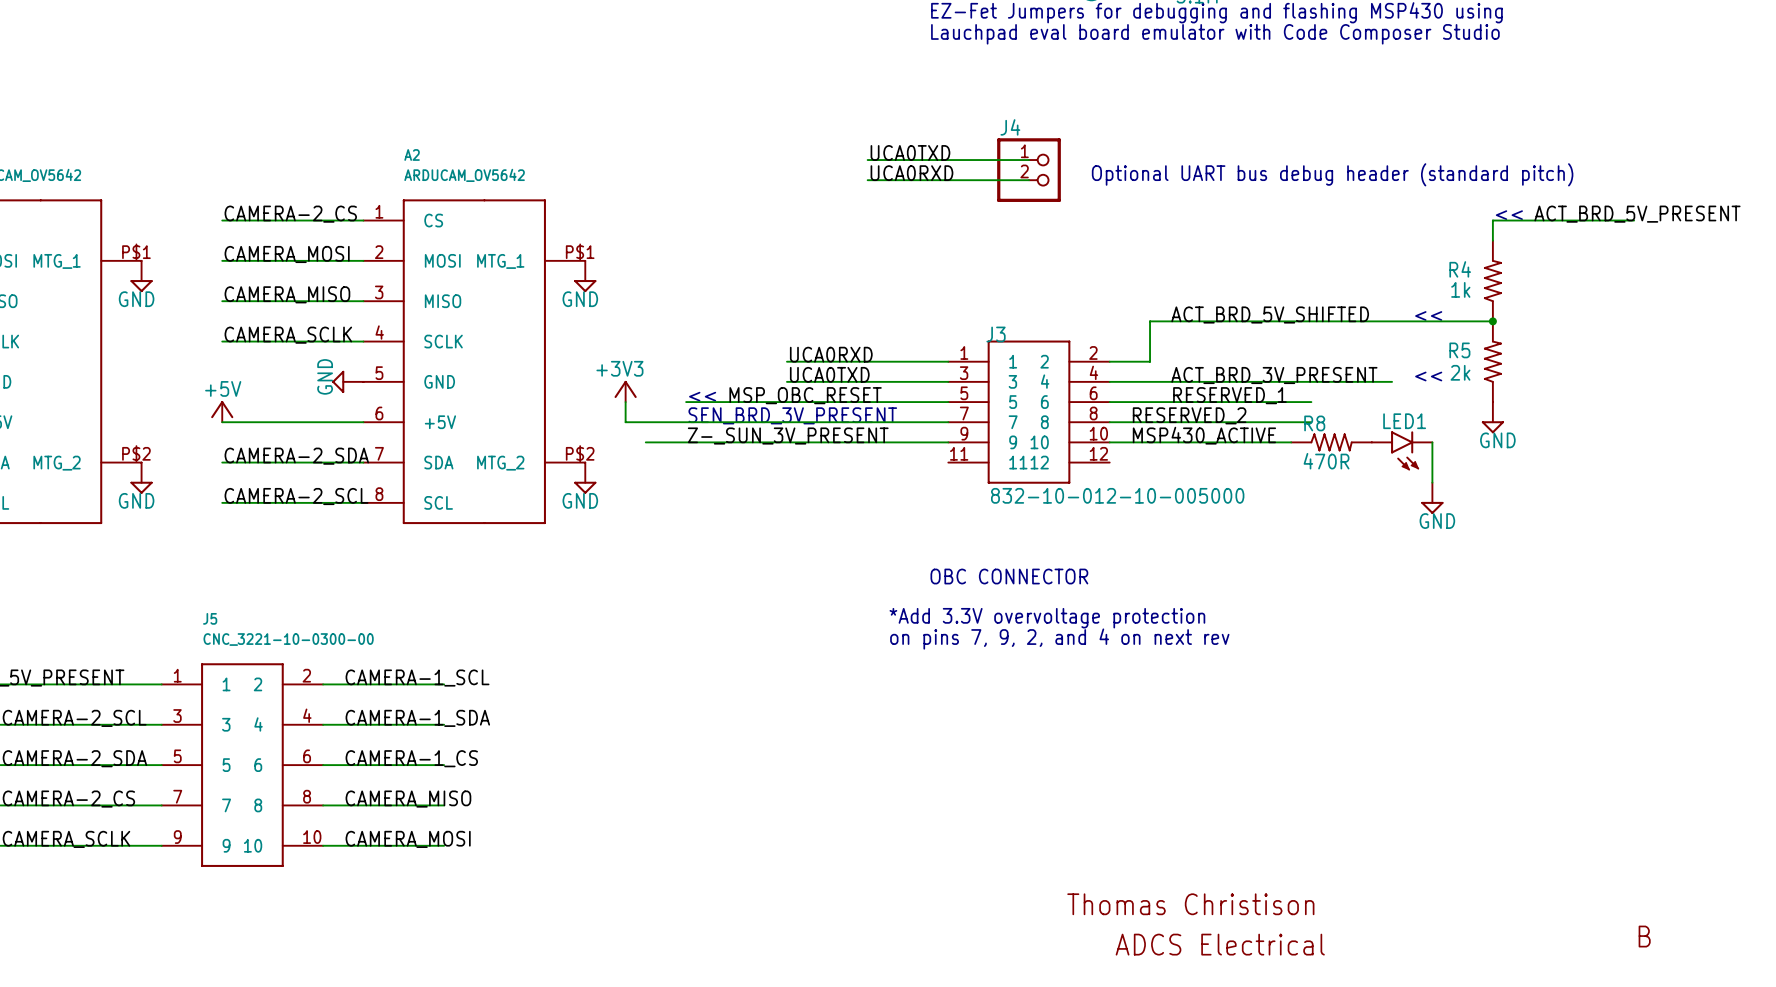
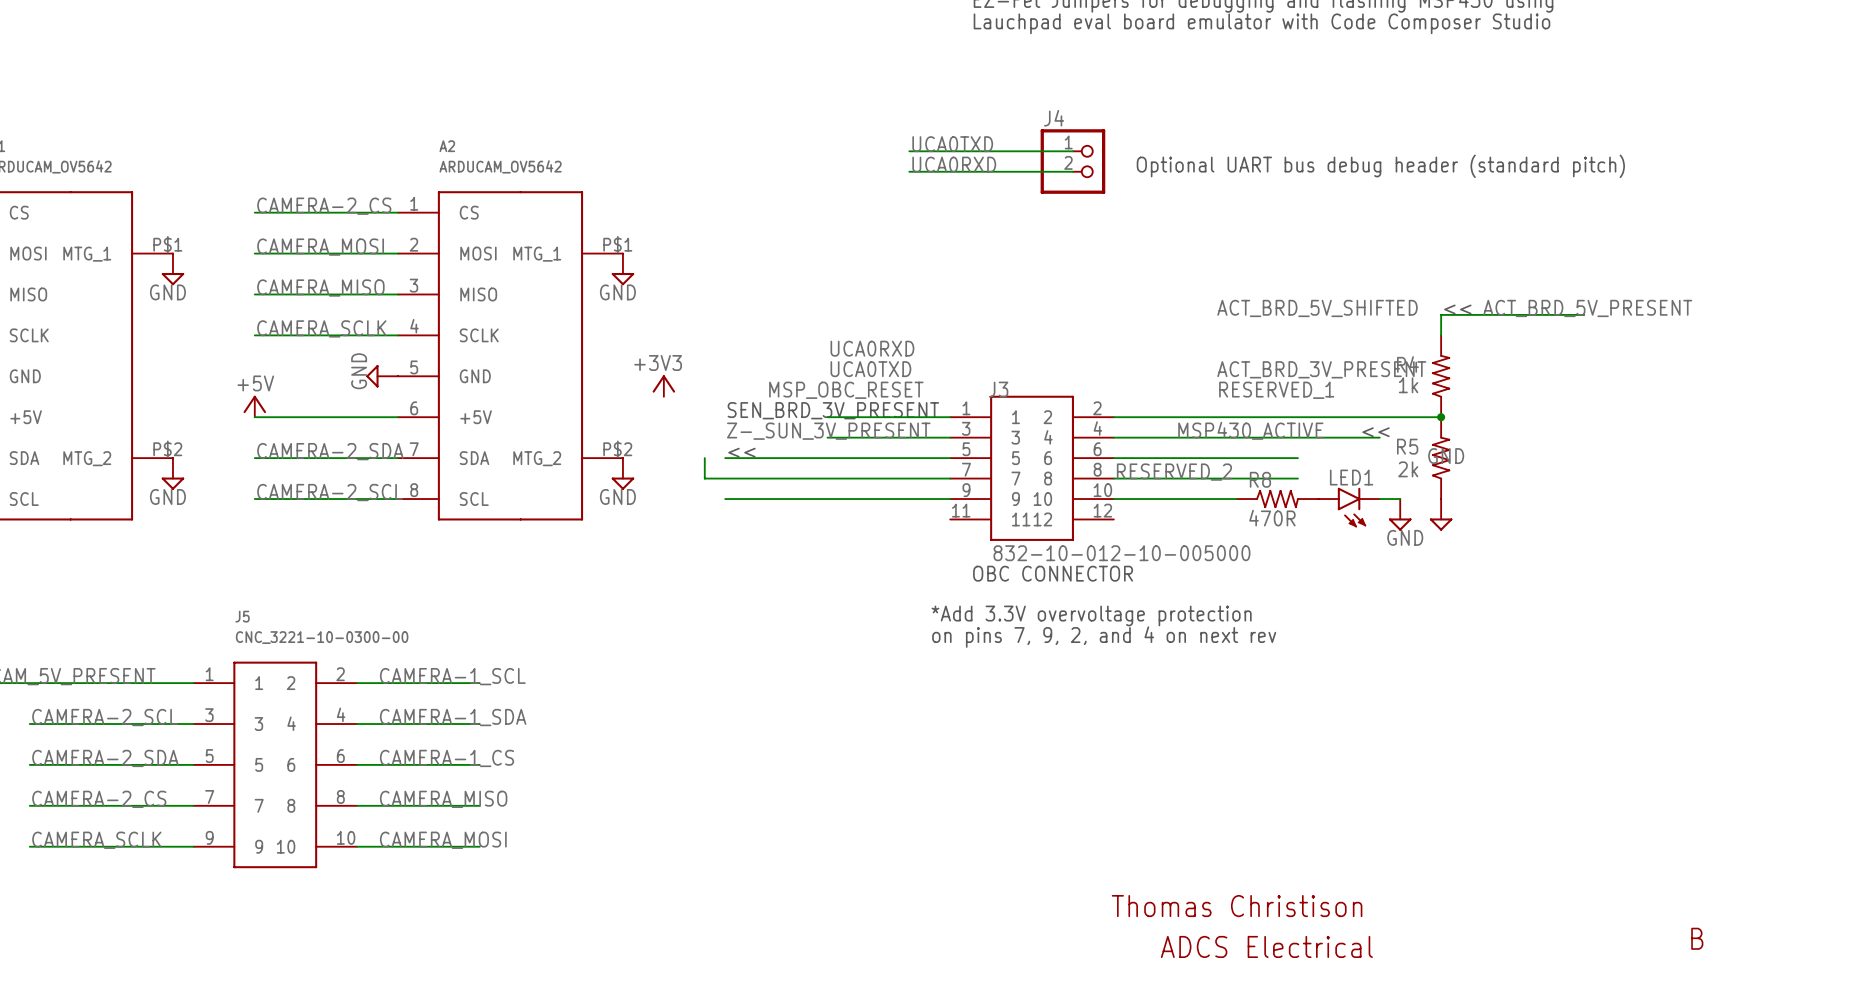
label position: ACT_BRD_5V_PRESENT (1637, 214) -> ACT_BRD_5V_PRESENT (1587, 308)
text: << (1509, 215) -> none
wire: (1634, 220) (1492, 220) (1492, 240) -> none
R4 position: (1492, 281) -> (1441, 376)
text position: << (1428, 316) -> << (1457, 309)
wire: (1392, 321) (1150, 321) (1150, 361) (1109, 361) -> (1441, 314) (1441, 335)
wire: none -> (1543, 314) (1584, 314)
junction: (1492, 321) -> none
wire: (786, 361) (948, 361) -> none
R5 position: (1492, 361) -> (1441, 458)
text: << (1428, 376) -> none
wire: (786, 381) (948, 381) -> none
wire: (1109, 381) (1392, 381) -> none
text position: << (702, 396) -> << (741, 452)
wire: (625, 402) (625, 422) (786, 422) -> none
wire: (686, 402) (948, 402) -> none
wire: (1109, 402) (1311, 402) -> none
J3 position: (1029, 412) -> (1032, 468)
label position: RESERVED_2 (1189, 415) -> RESERVED_2 (1174, 472)
power symbol: GND (1492, 417) -> none
wire: none -> (1359, 417) (1441, 417)
junction: none -> (1441, 417)
text: none -> << (1376, 432)
wire: (645, 442) (786, 442) -> none
R8 position: (1331, 442) -> (1277, 499)
wire: (1432, 442) (1432, 482) -> none
LED1 position: (1402, 450) -> (1349, 507)
wire: none -> (704, 458) (704, 478) (950, 478)
wire: none -> (725, 458) (950, 458)
wire: none -> (1113, 458) (1297, 458)
wire: none -> (1113, 478) (1297, 478)
power symbol: GND (1432, 498) -> none
wire: none -> (725, 499) (950, 499)
wire: none -> (1113, 499) (1236, 499)
wire: none -> (1379, 499) (1400, 499)
power symbol: none -> GND (1400, 514)
power symbol: none -> GND (1441, 514)

